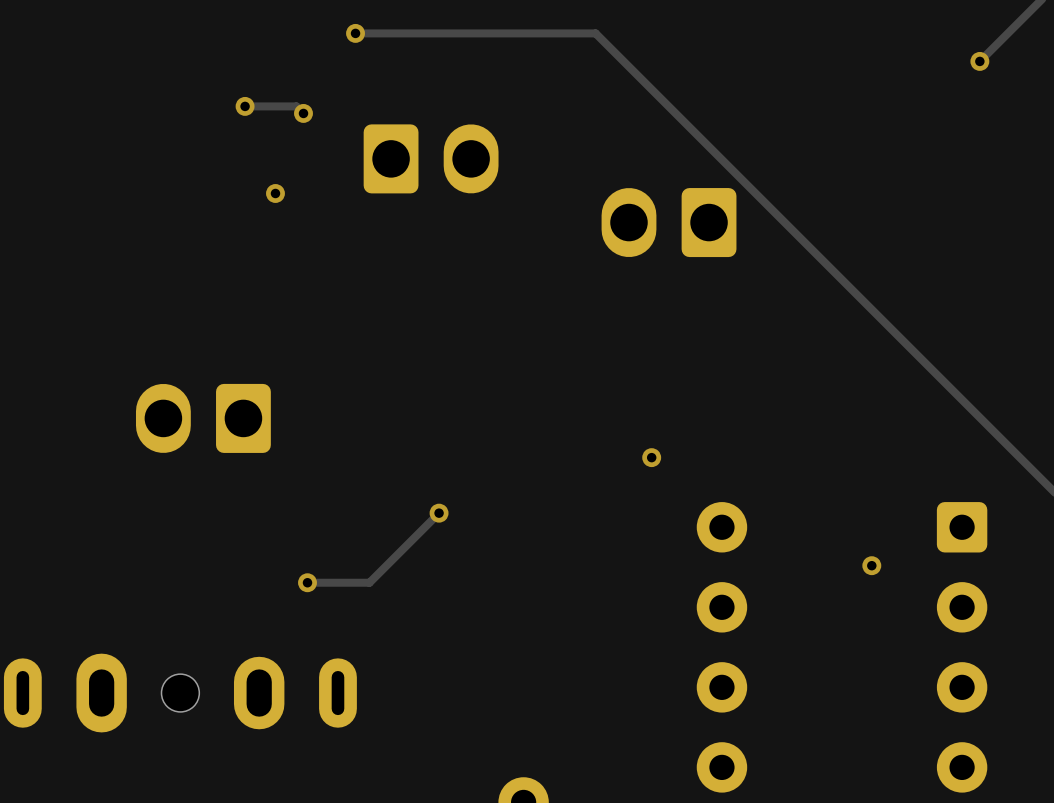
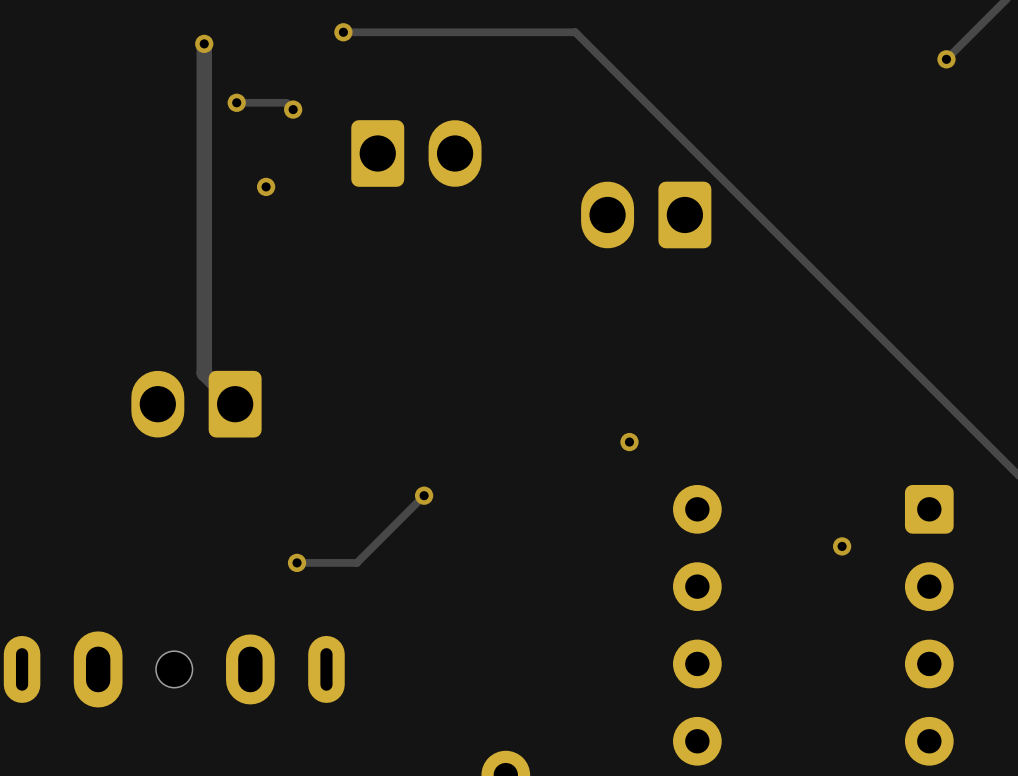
track: none -> (204, 43) (204, 373) (235, 404)
via: none -> (204, 43)

